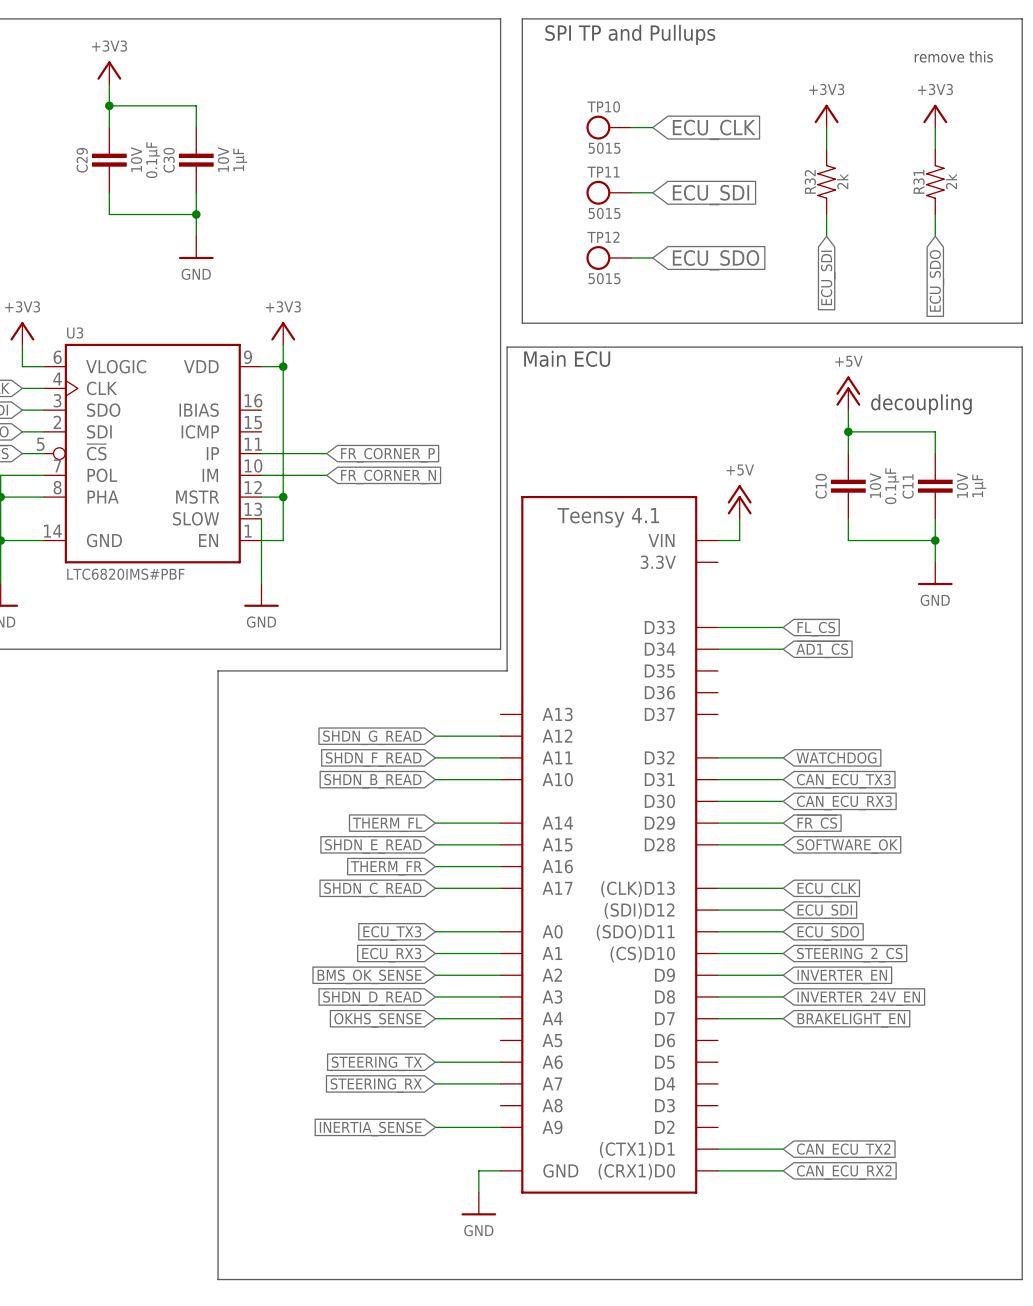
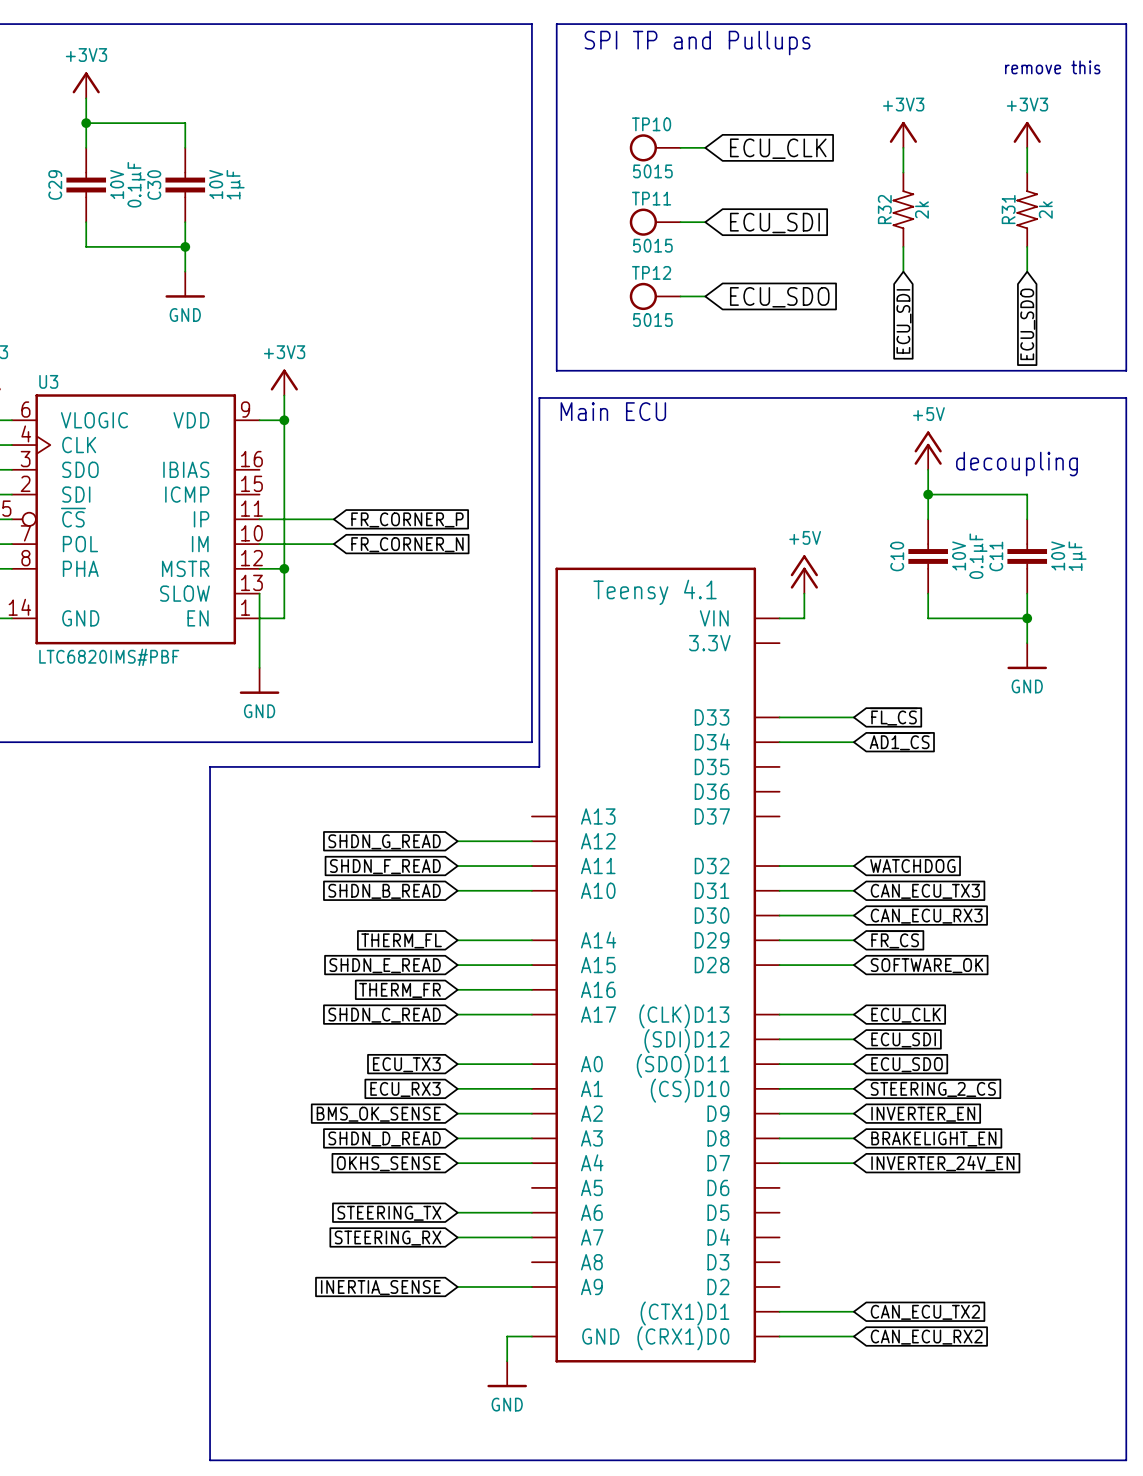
global label: INVERTER_24V_EN (858, 998) -> BRAKELIGHT_EN (933, 1139)
global label: BRAKELIGHT_EN (851, 1020) -> INVERTER_24V_EN (942, 1163)

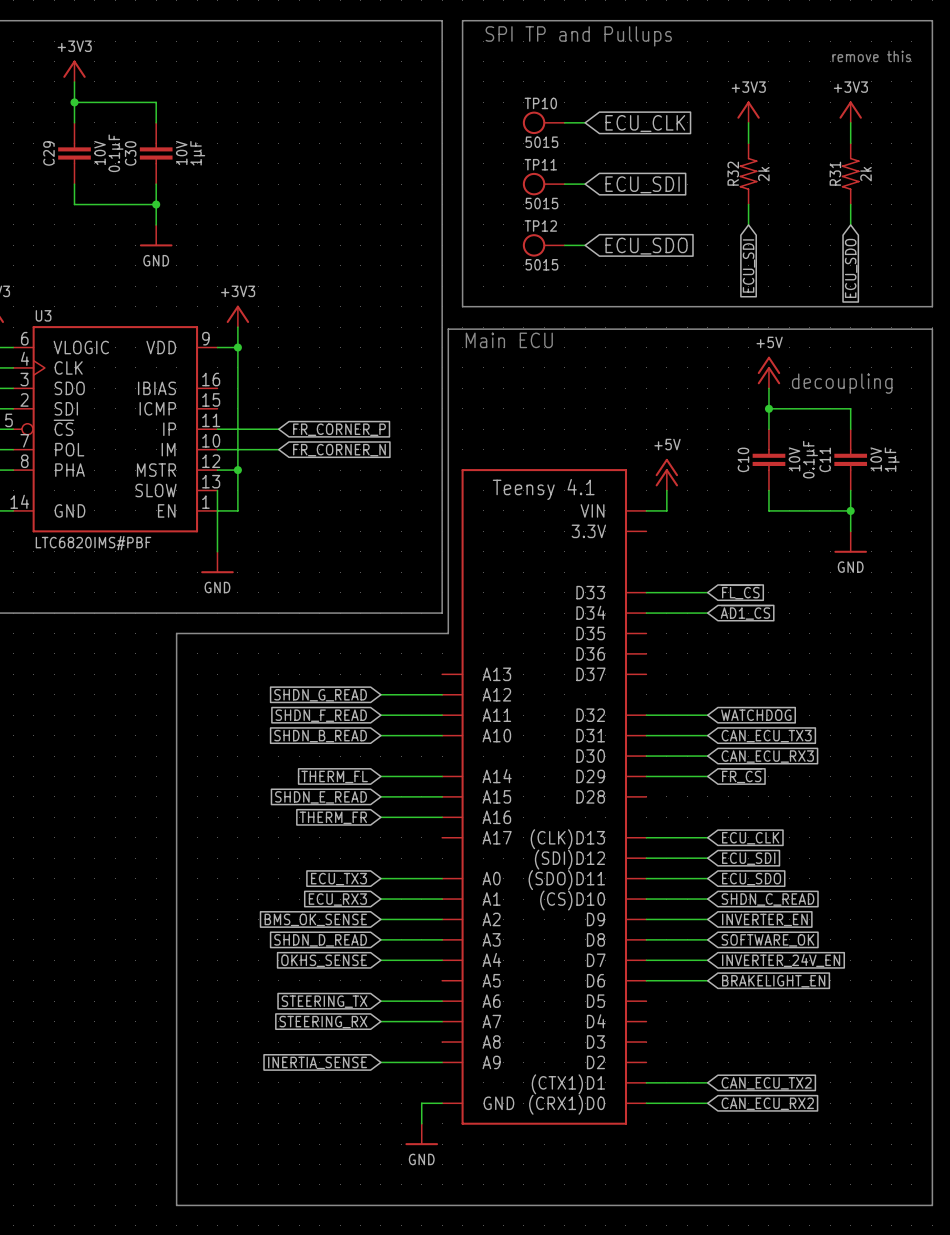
wire: (779, 965) (853, 965) -> (646, 980) (707, 980)
global label: SOFTWARE_OK (926, 965) -> none
wire: (457, 1014) (531, 1014) -> none
global label: SHDN_C_READ (384, 1015) -> none
global label: ~{STEERING_2_CS} (933, 1088) -> SHDN_C_READ (767, 899)
global label: BRAKELIGHT_EN (933, 1139) -> SOFTWARE_OK (767, 940)
global label: none -> BRAKELIGHT_EN (773, 981)

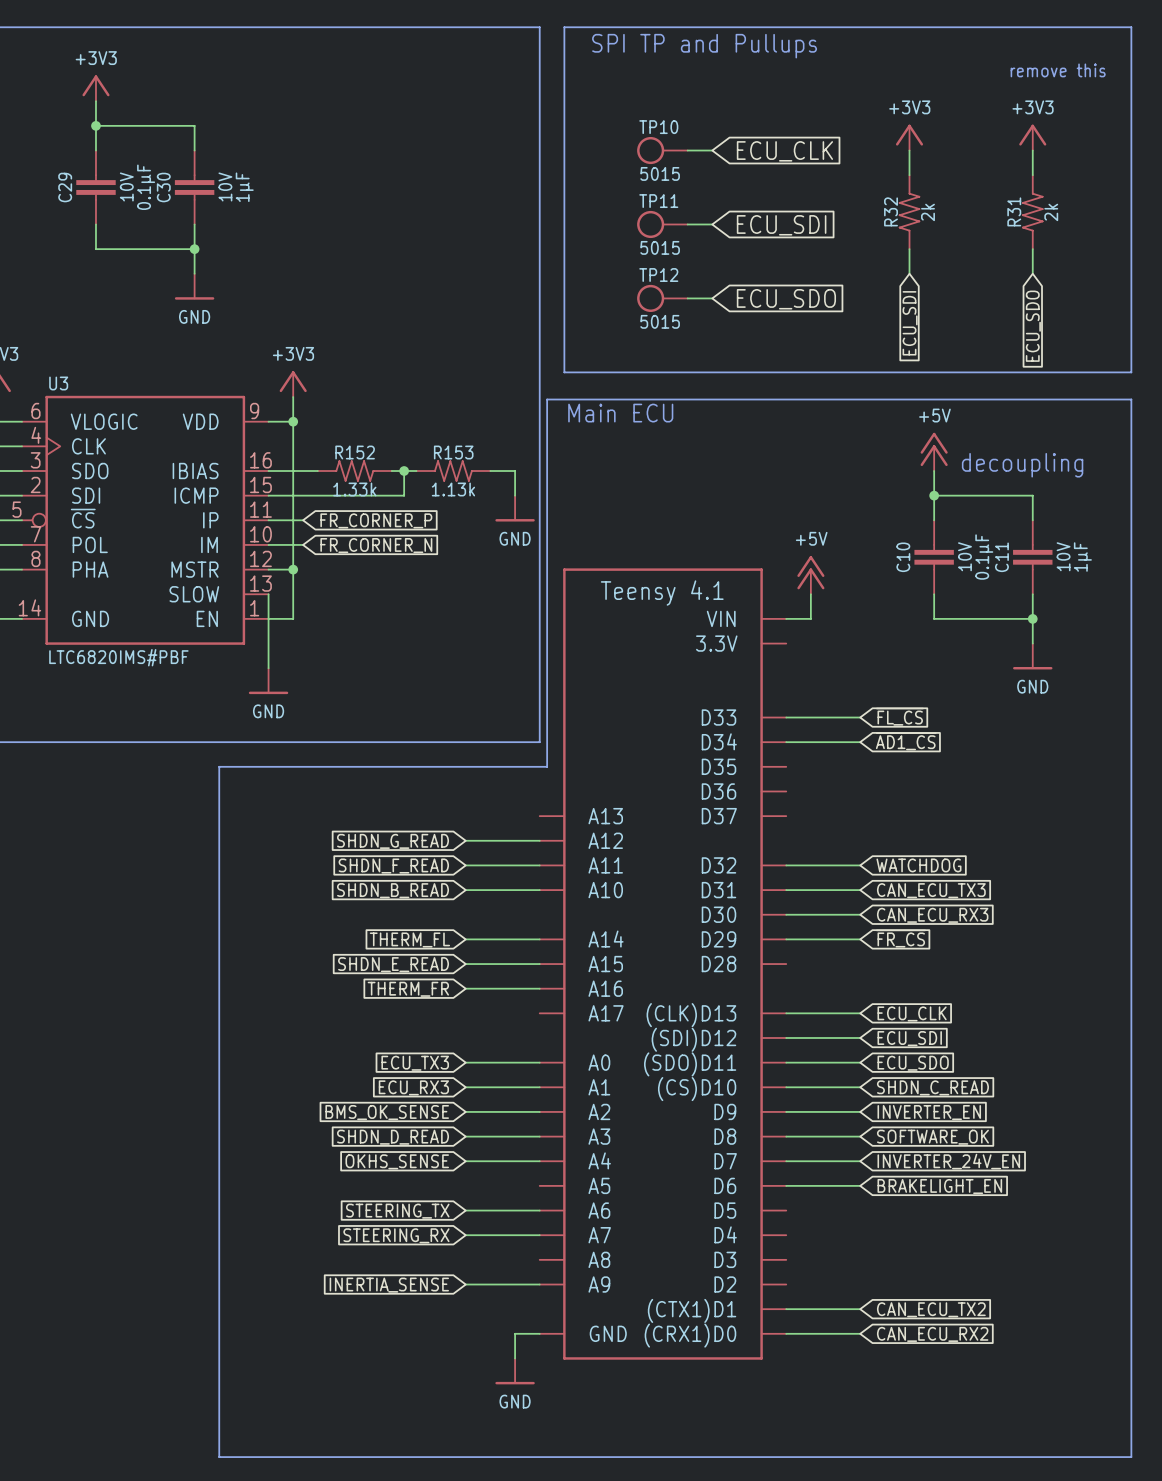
wire: none -> (268, 471) (317, 471)
R152: none -> (354, 471)
wire: none -> (391, 471) (416, 471)
wire: none -> (404, 471) (404, 495) (268, 495)
junction: none -> (404, 471)
R153: none -> (453, 471)
wire: none -> (490, 471) (515, 471) (515, 495)
power symbol: none -> GND (515, 508)
wire: (246, 429) (278, 429) -> none
global label position: FR_CORNER_P (339, 429) -> FR_CORNER_P (376, 520)
wire: (246, 449) (278, 449) -> none
global label position: FR_CORNER_N (339, 450) -> FR_CORNER_N (376, 545)

